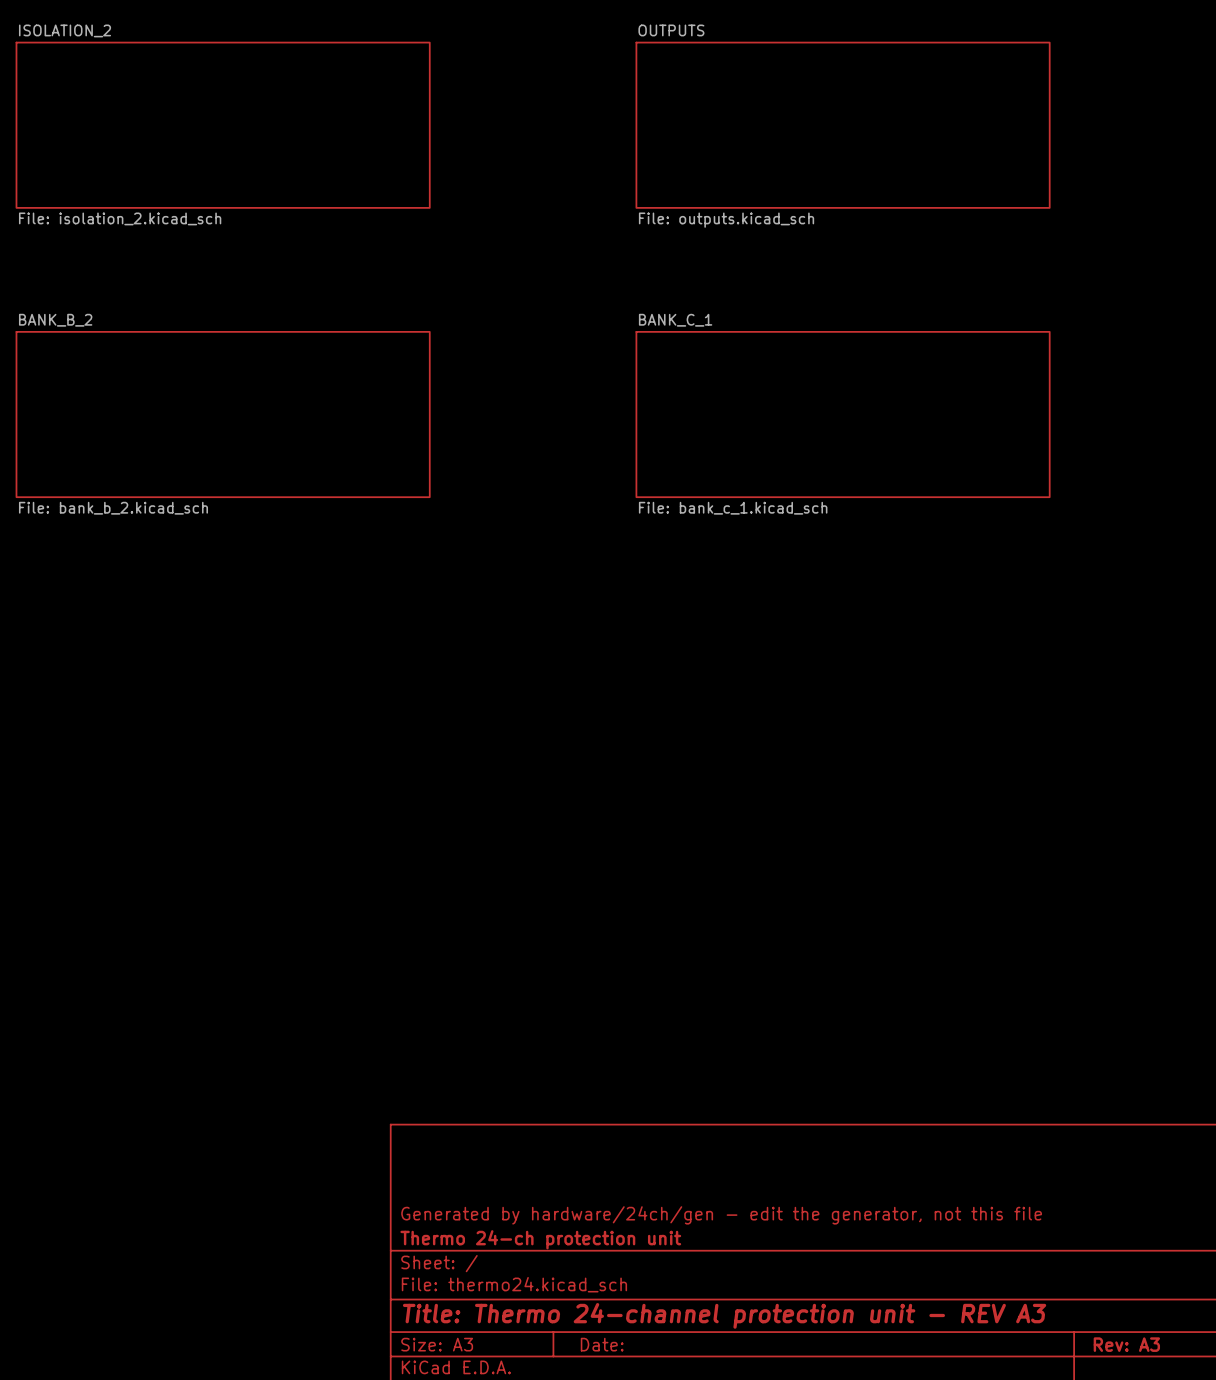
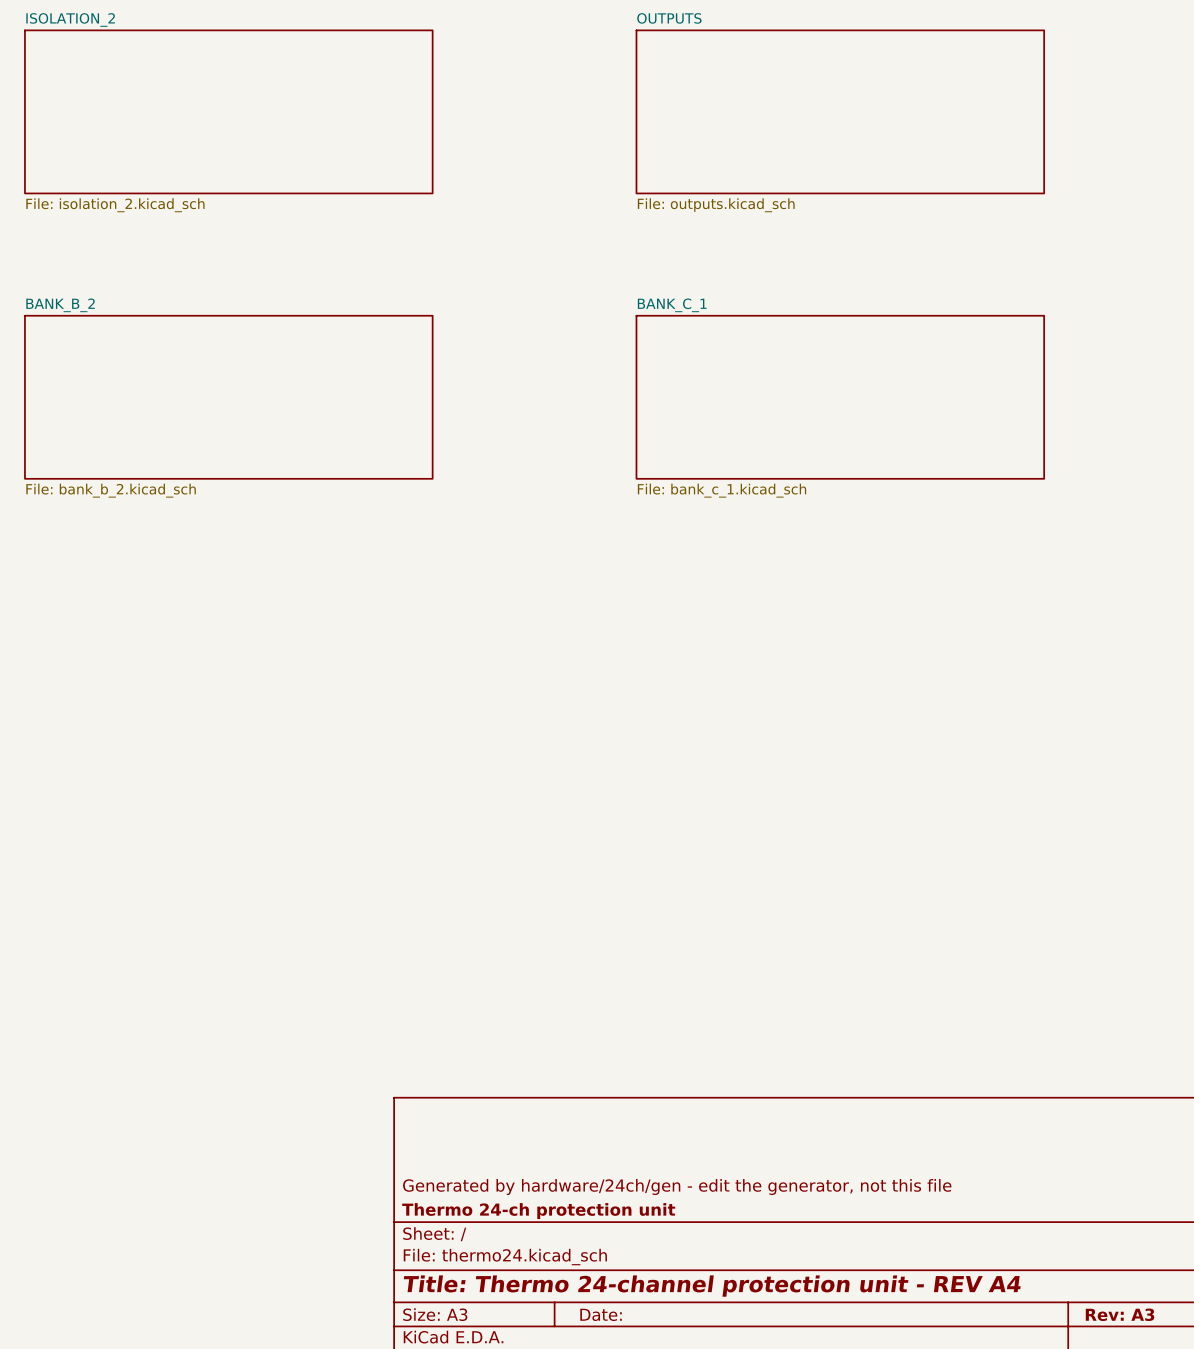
title block: Title: Thermo 24-channel protection unit - REV A3 (724, 1315) -> Title: Thermo 24-channel protection unit - REV A4 (712, 1286)

